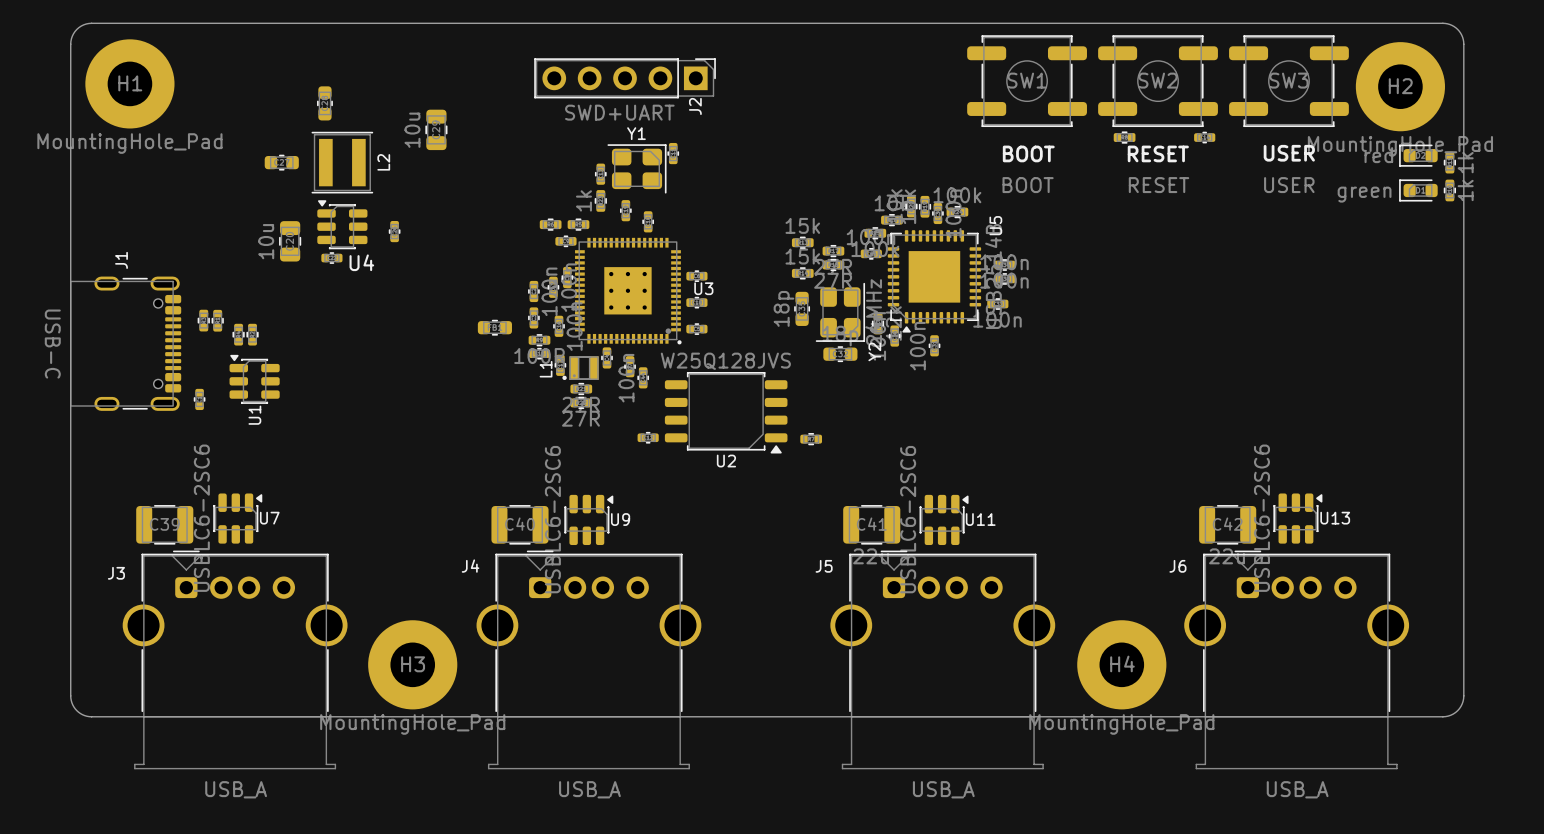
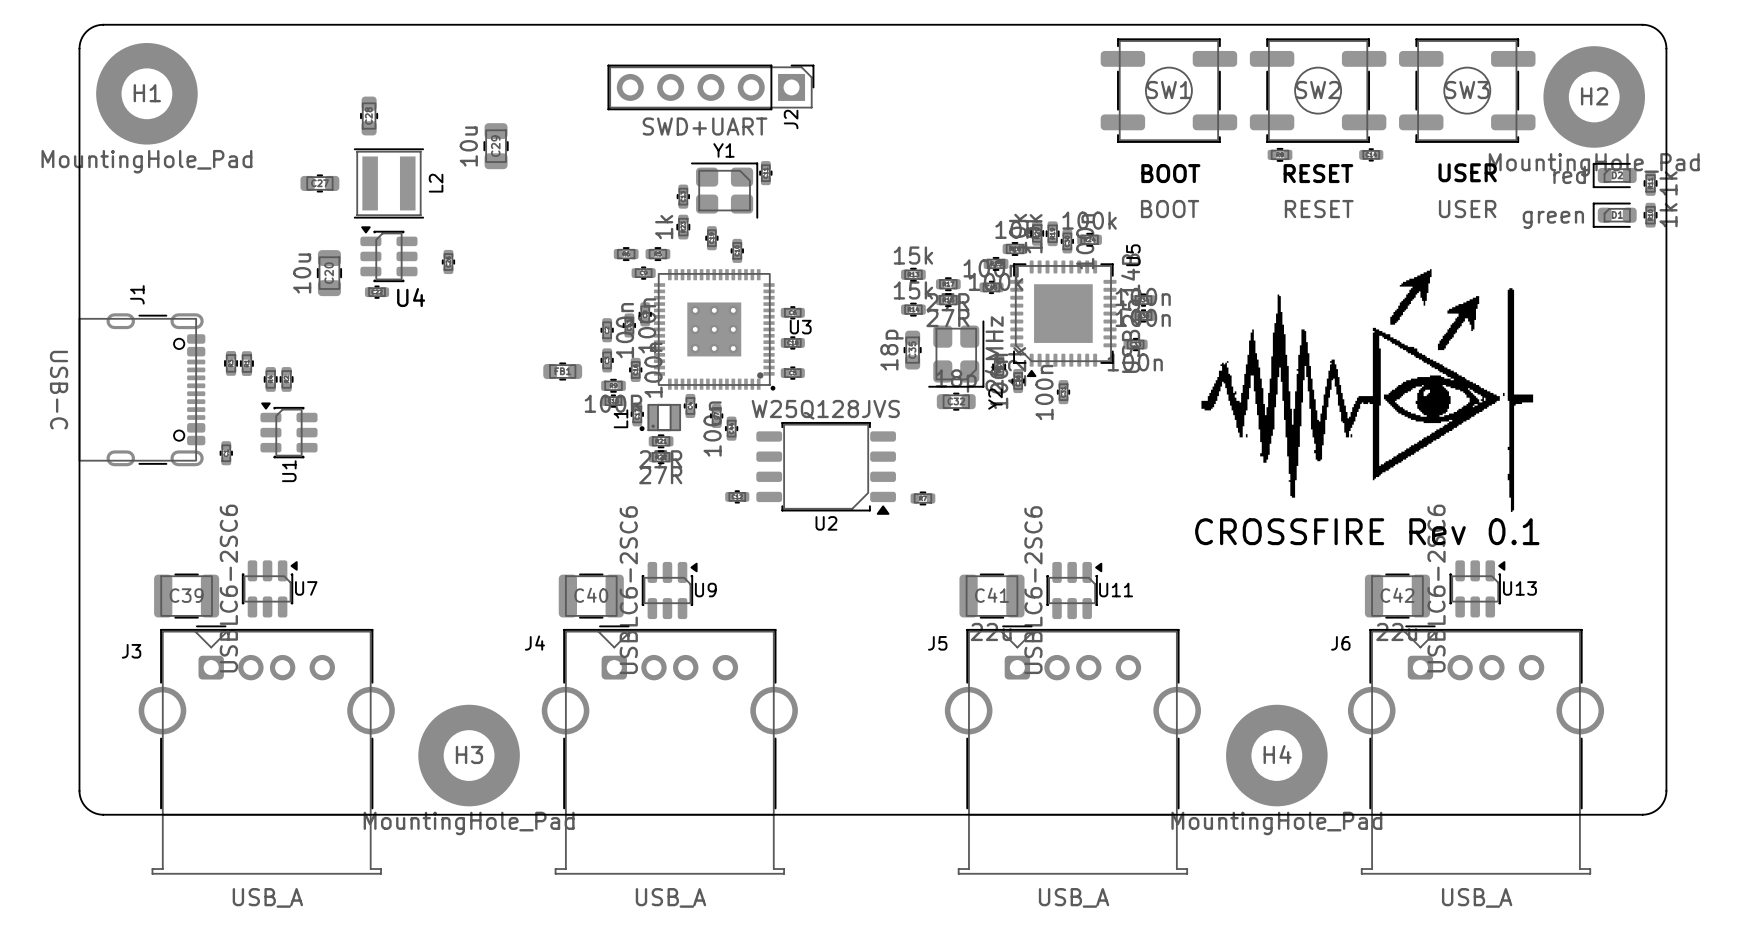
drawing: none -> [1201, 269, 1534, 512]
text: none -> CROSSFIRE Rev 0.1 (1367, 531)

